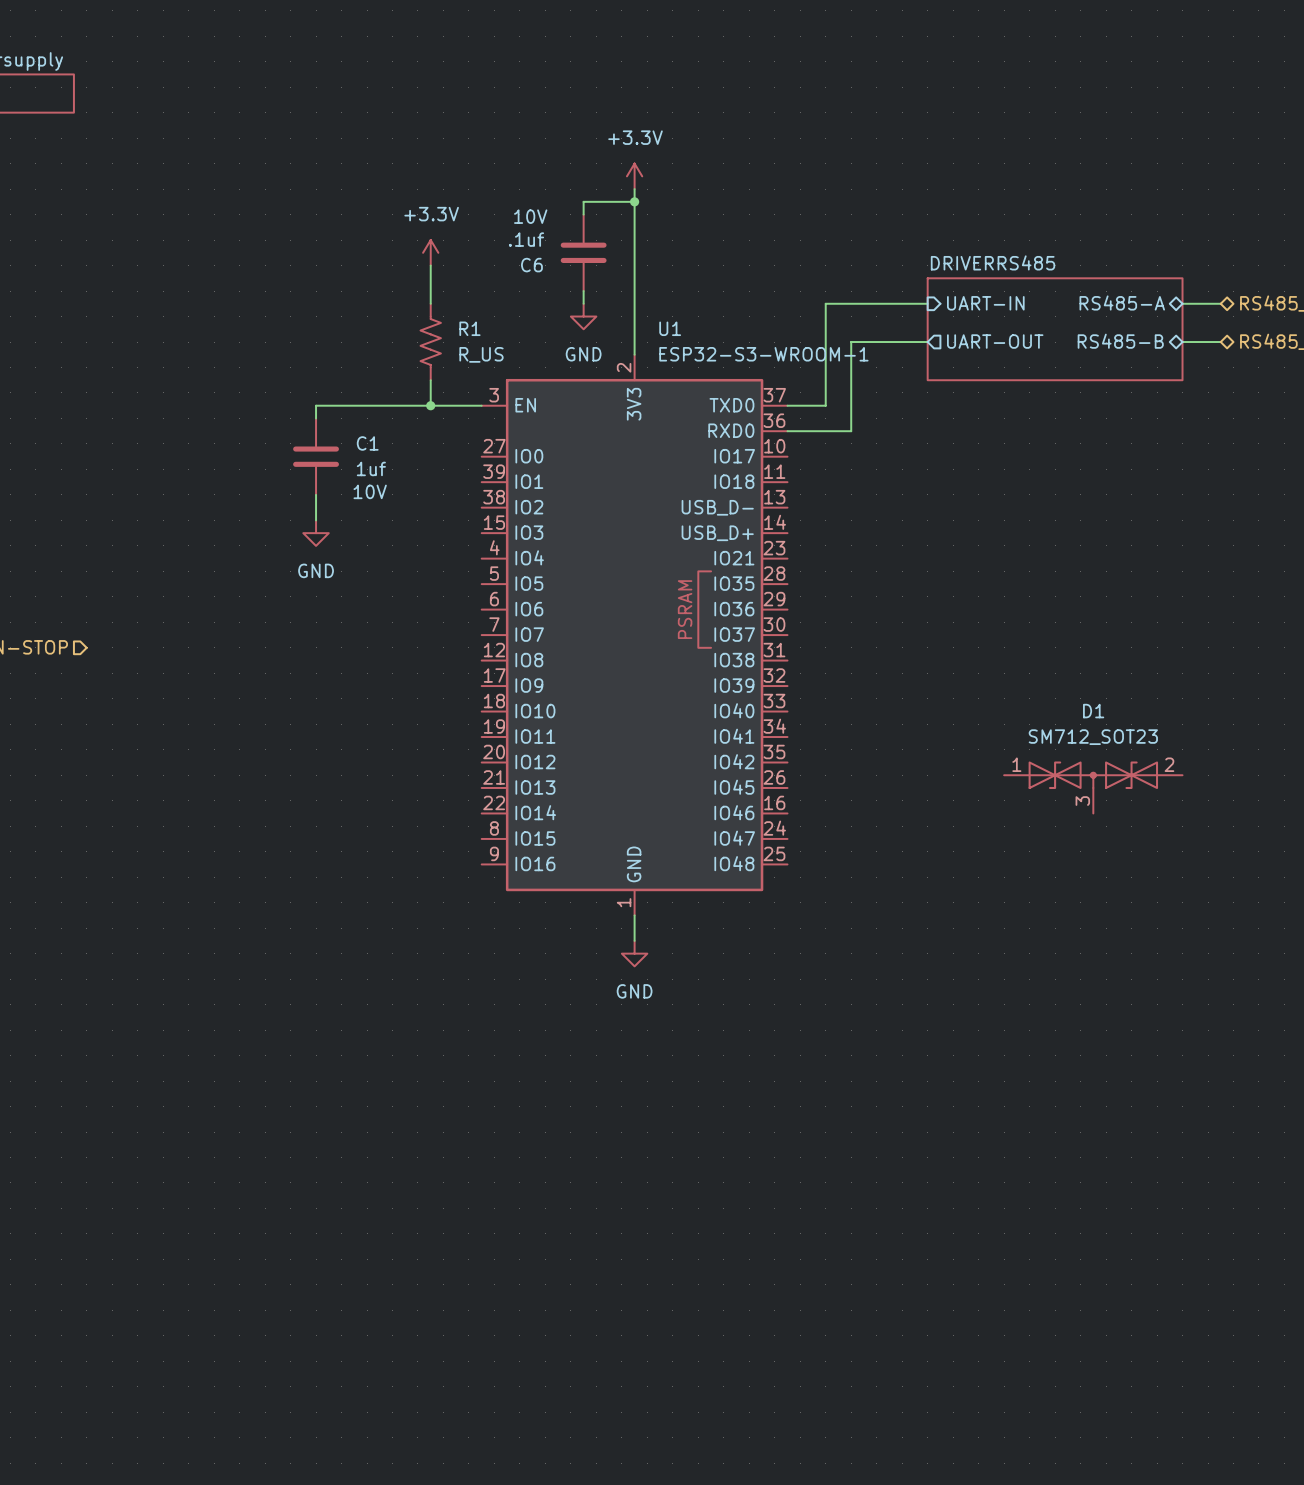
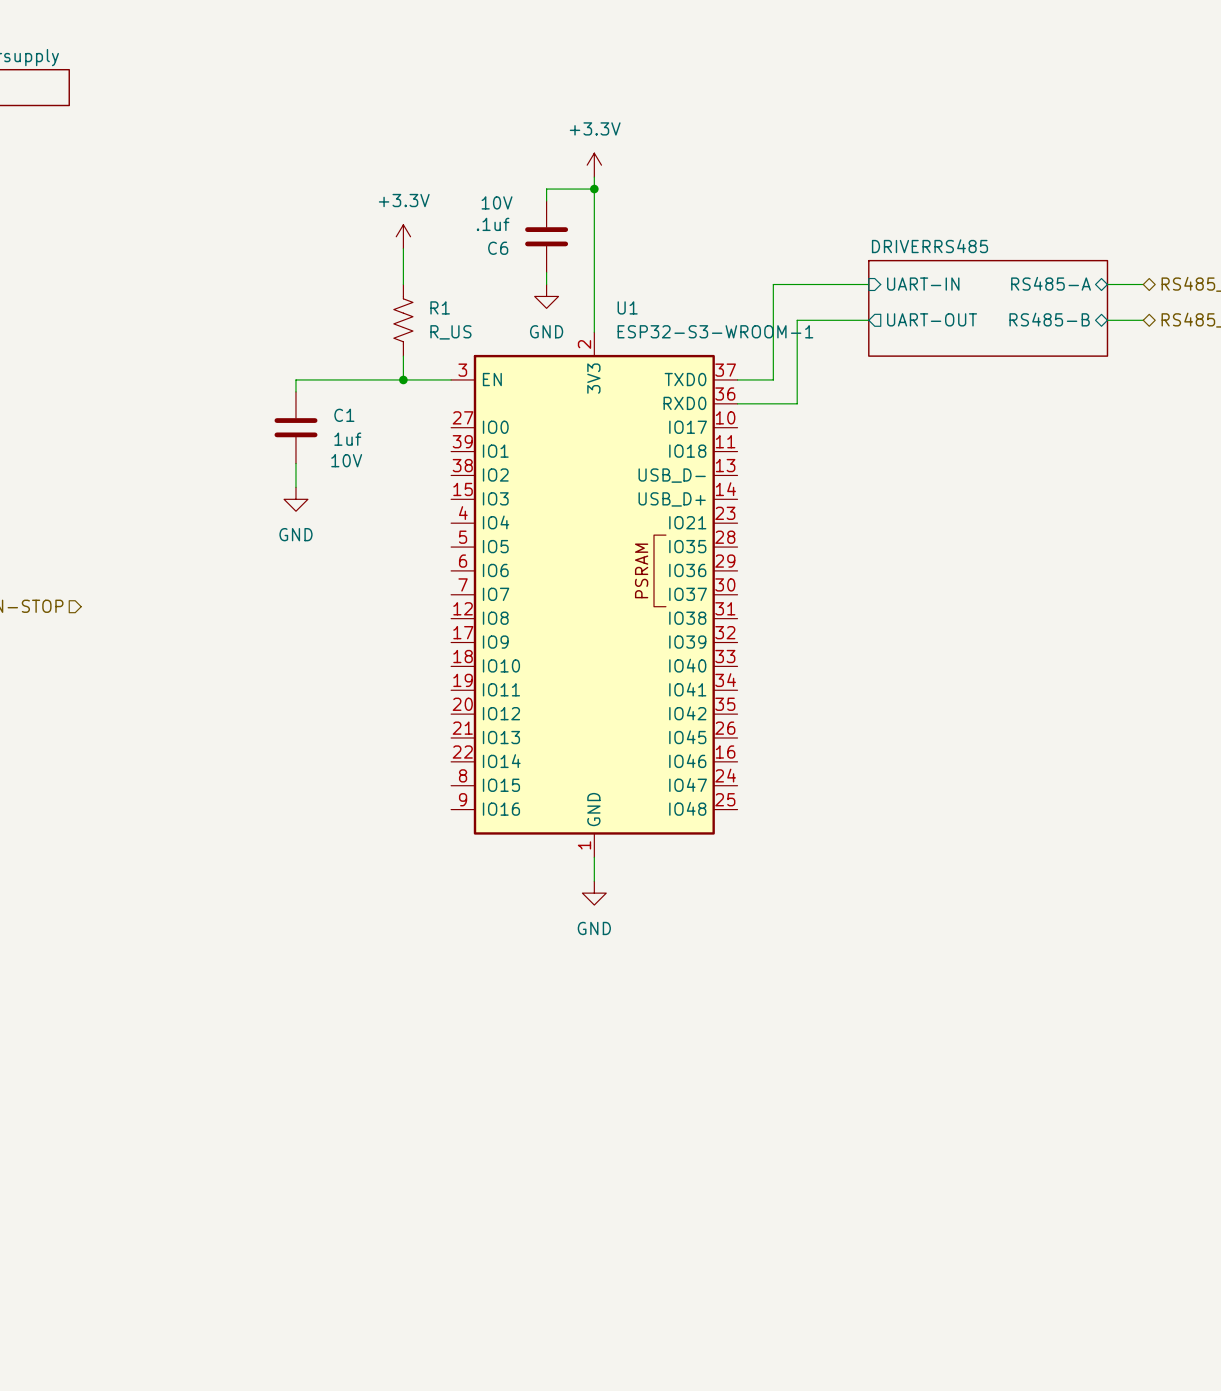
D1: SM712_SOT23 (1093, 787) -> none

